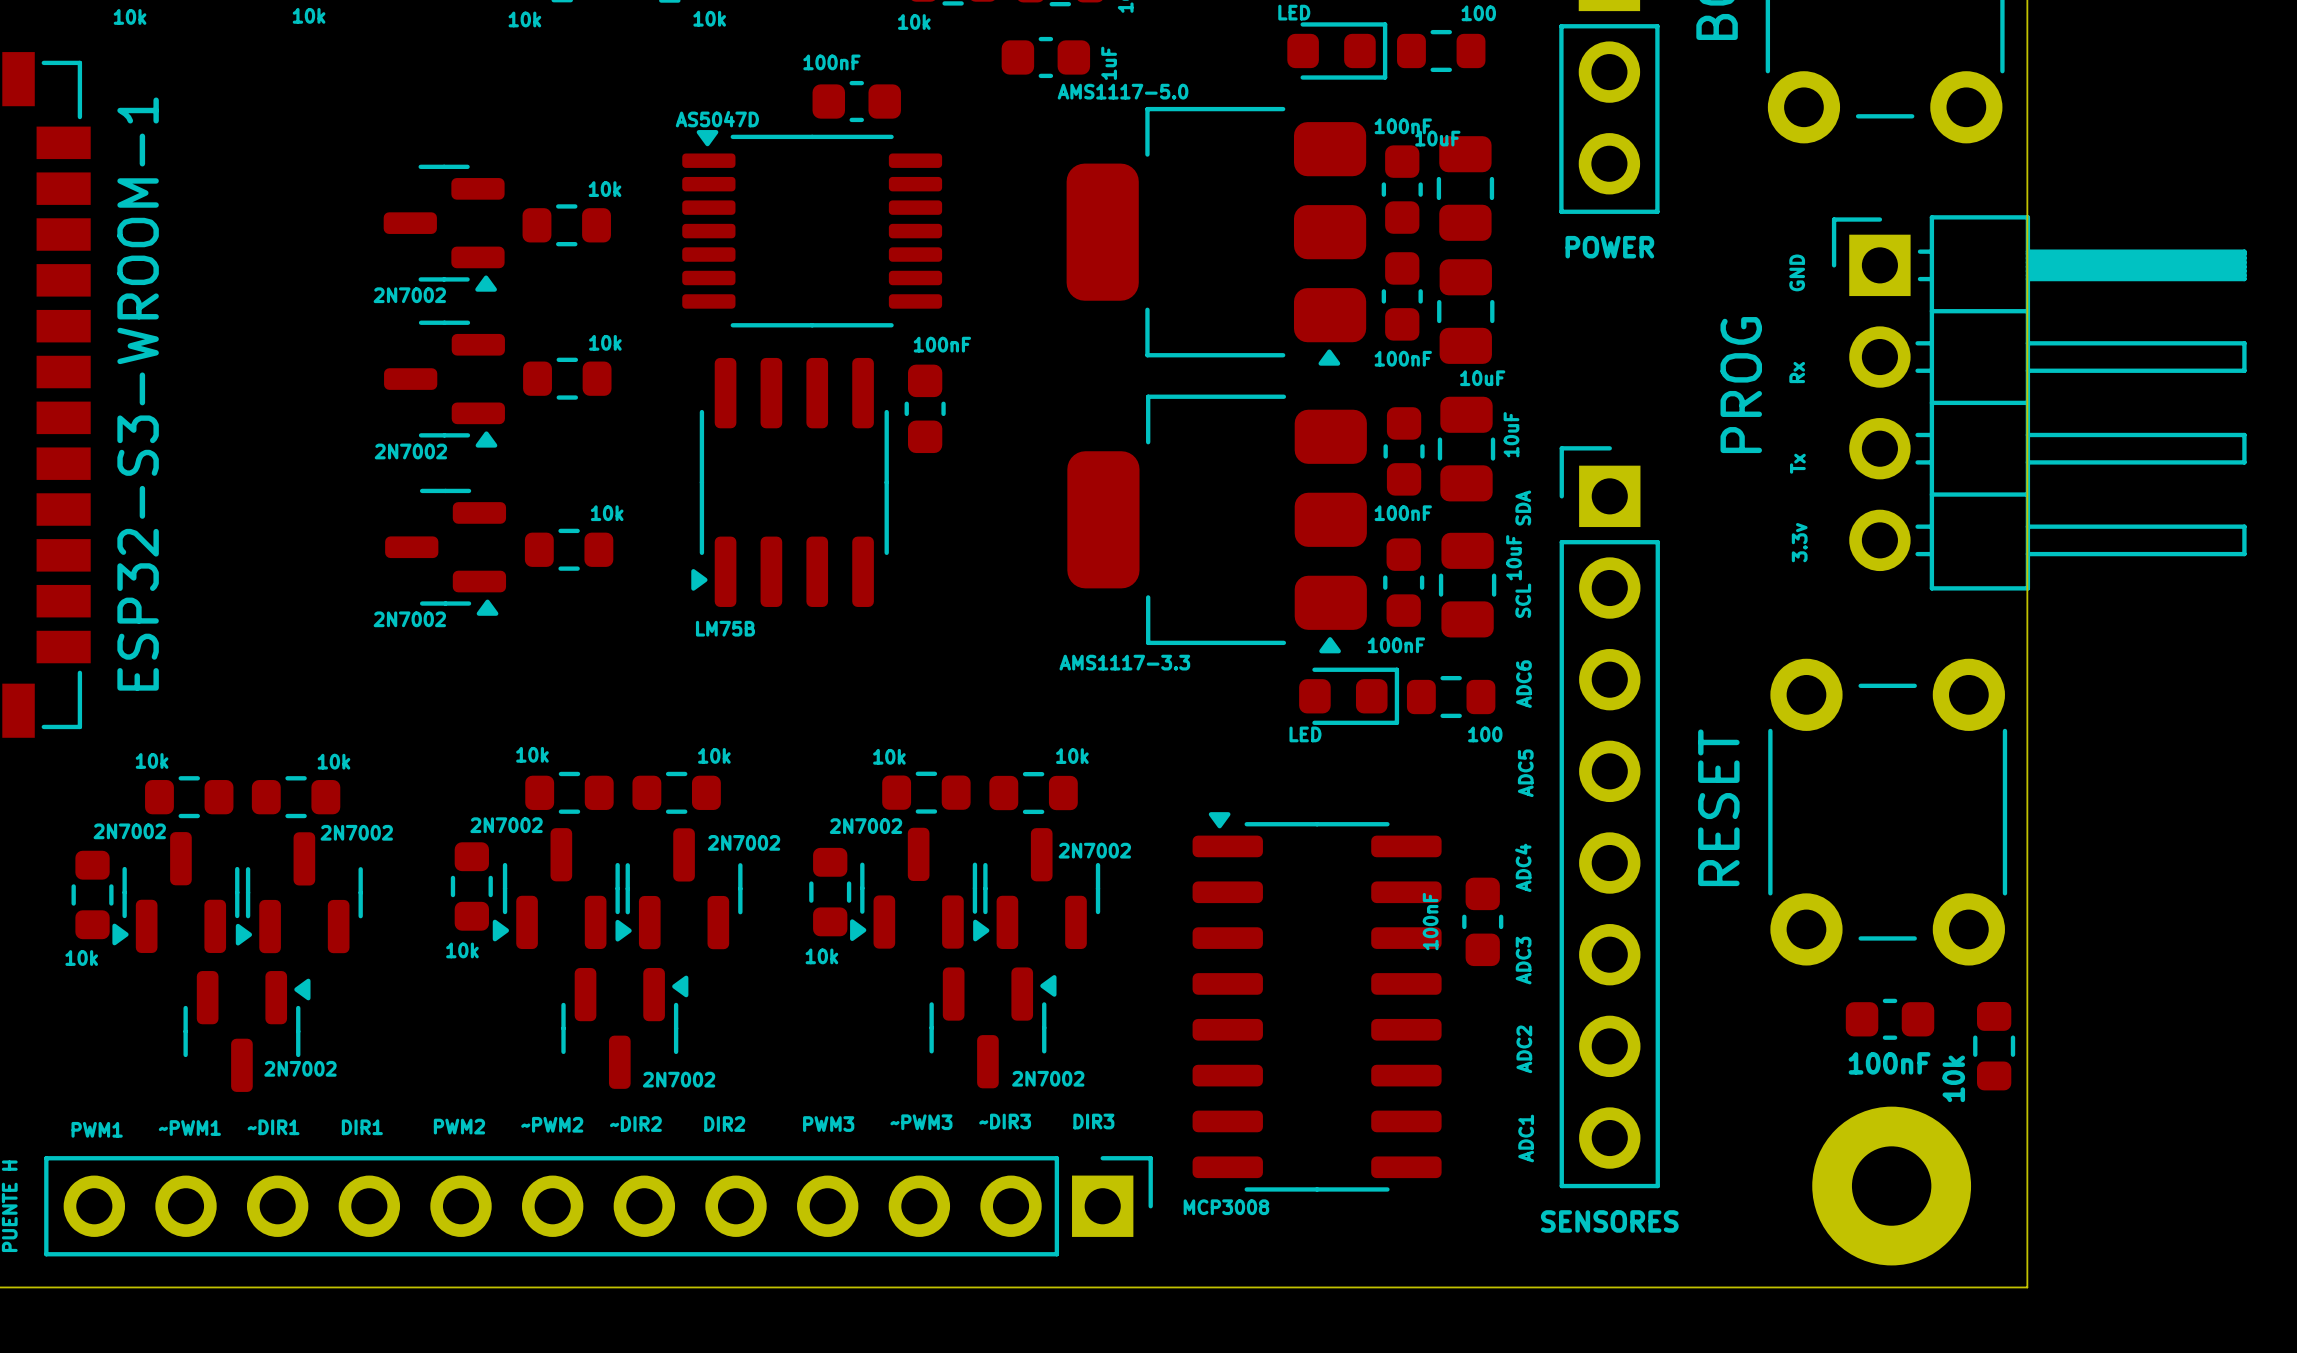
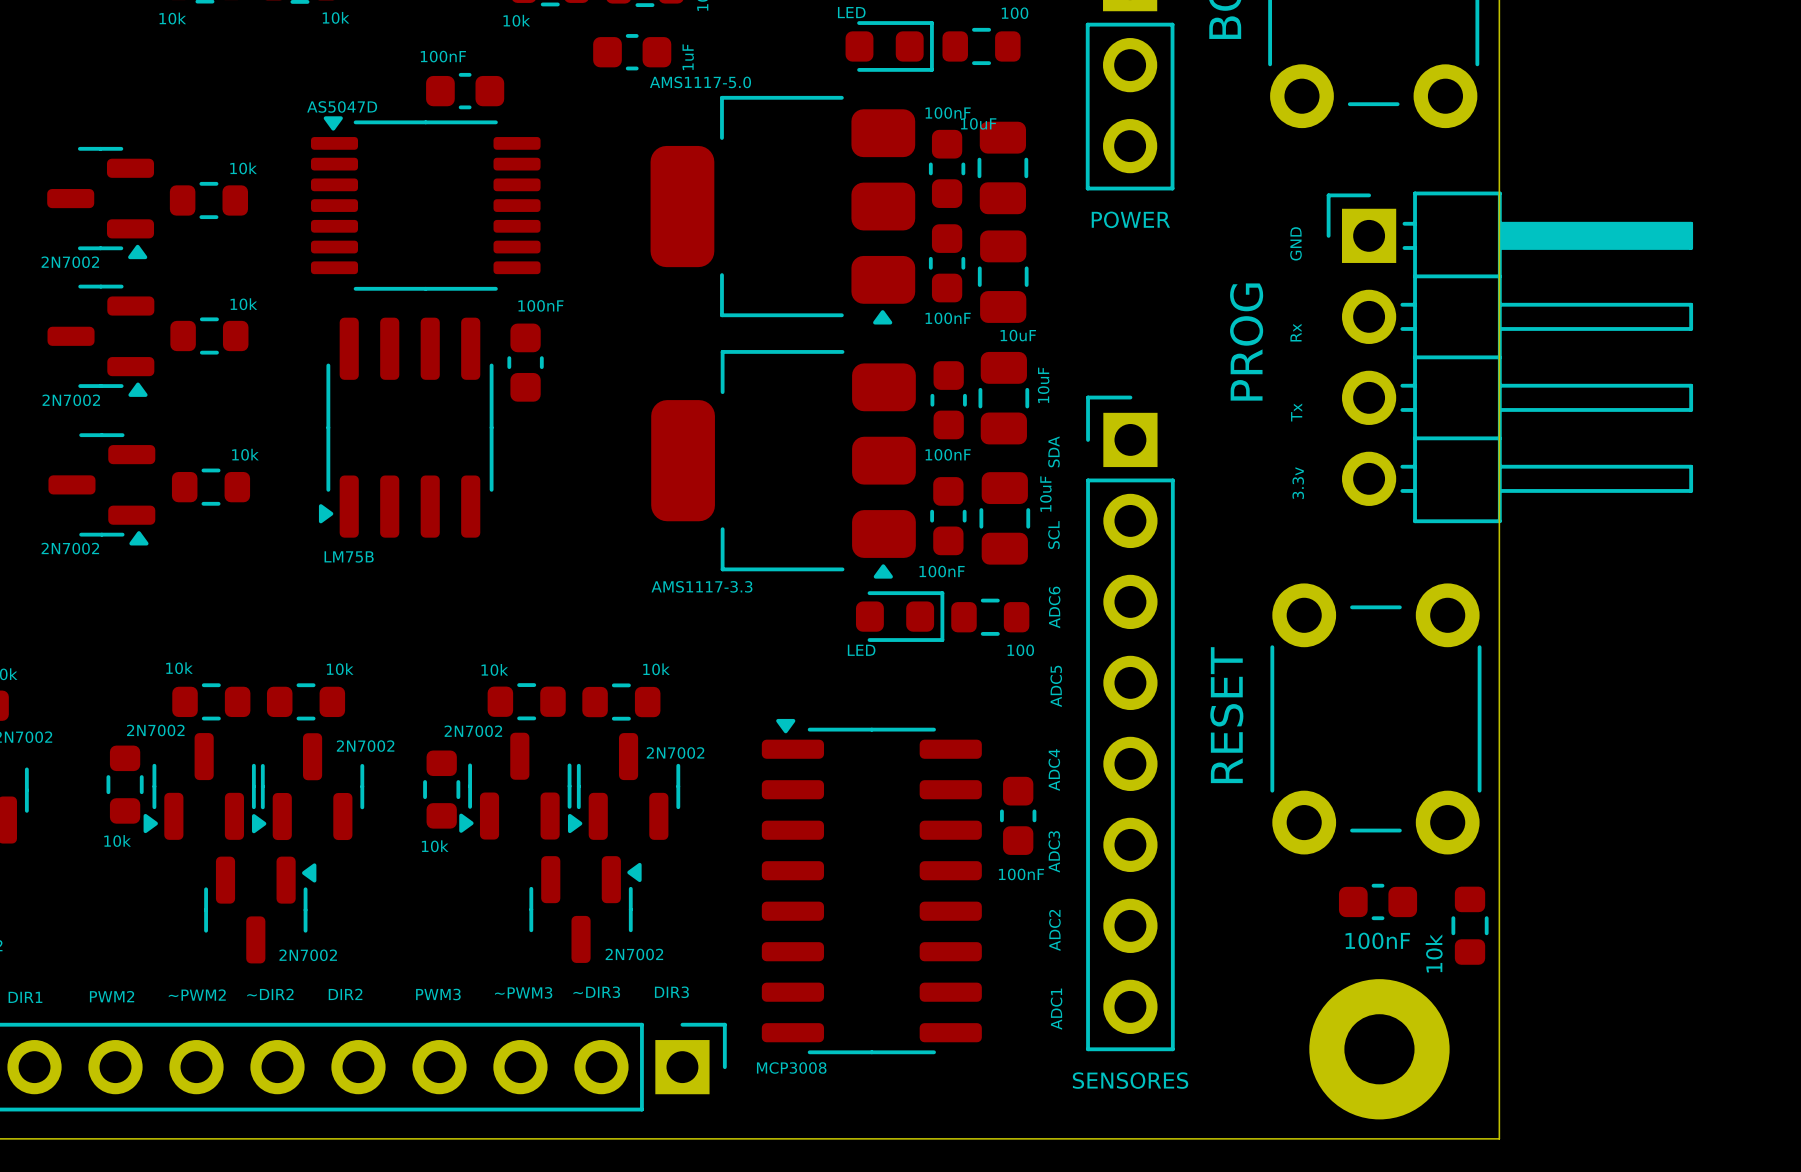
part value rotation: 0° (1430, 921) -> 90° clockwise (1021, 874)
part value position: 100nF (1430, 921) -> 100nF (1021, 874)

